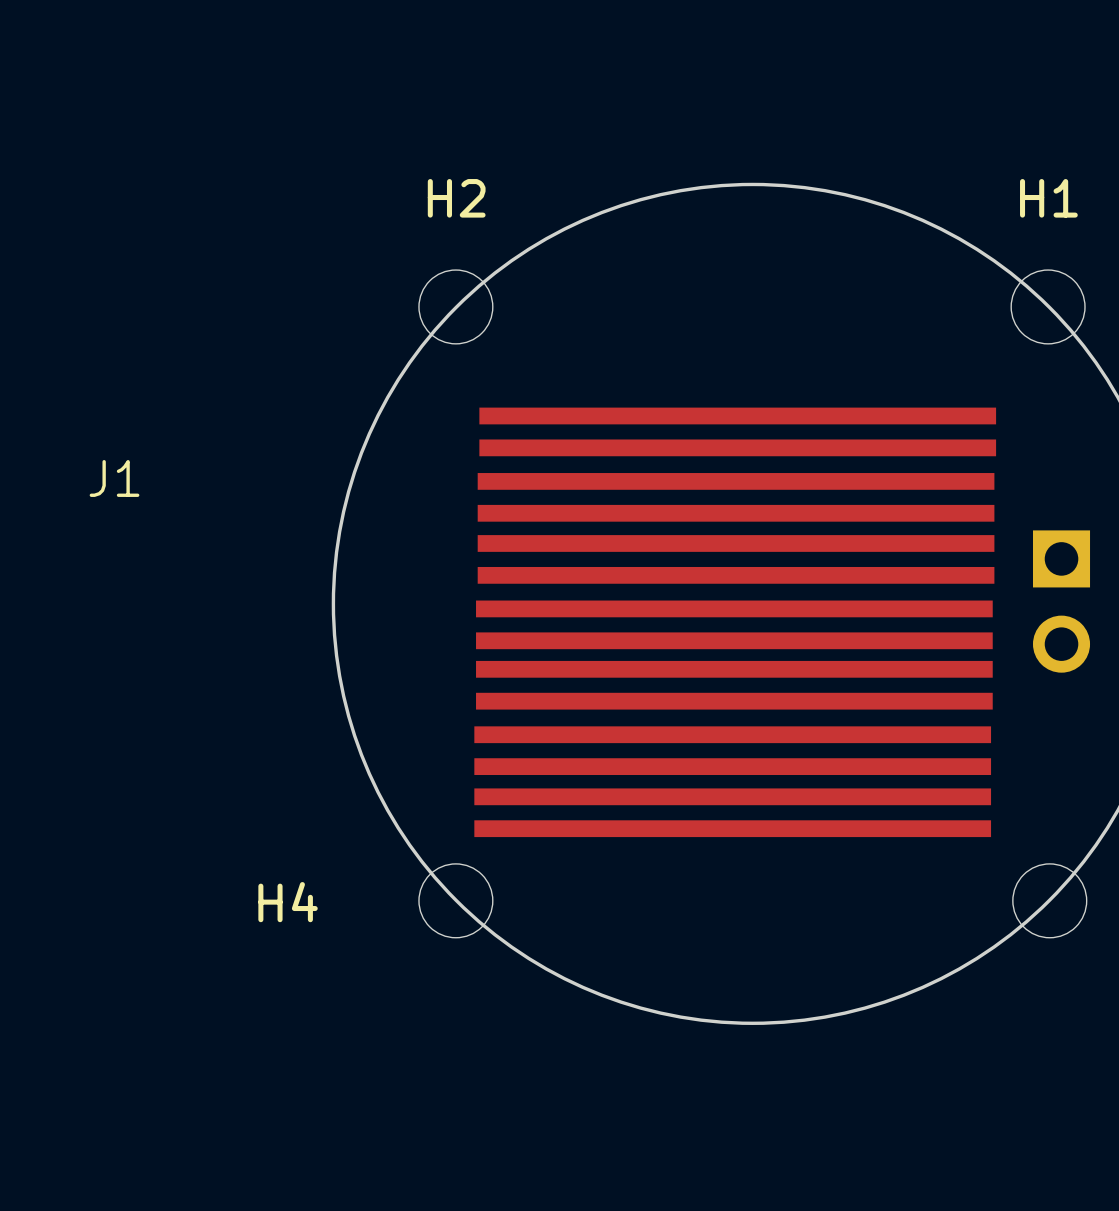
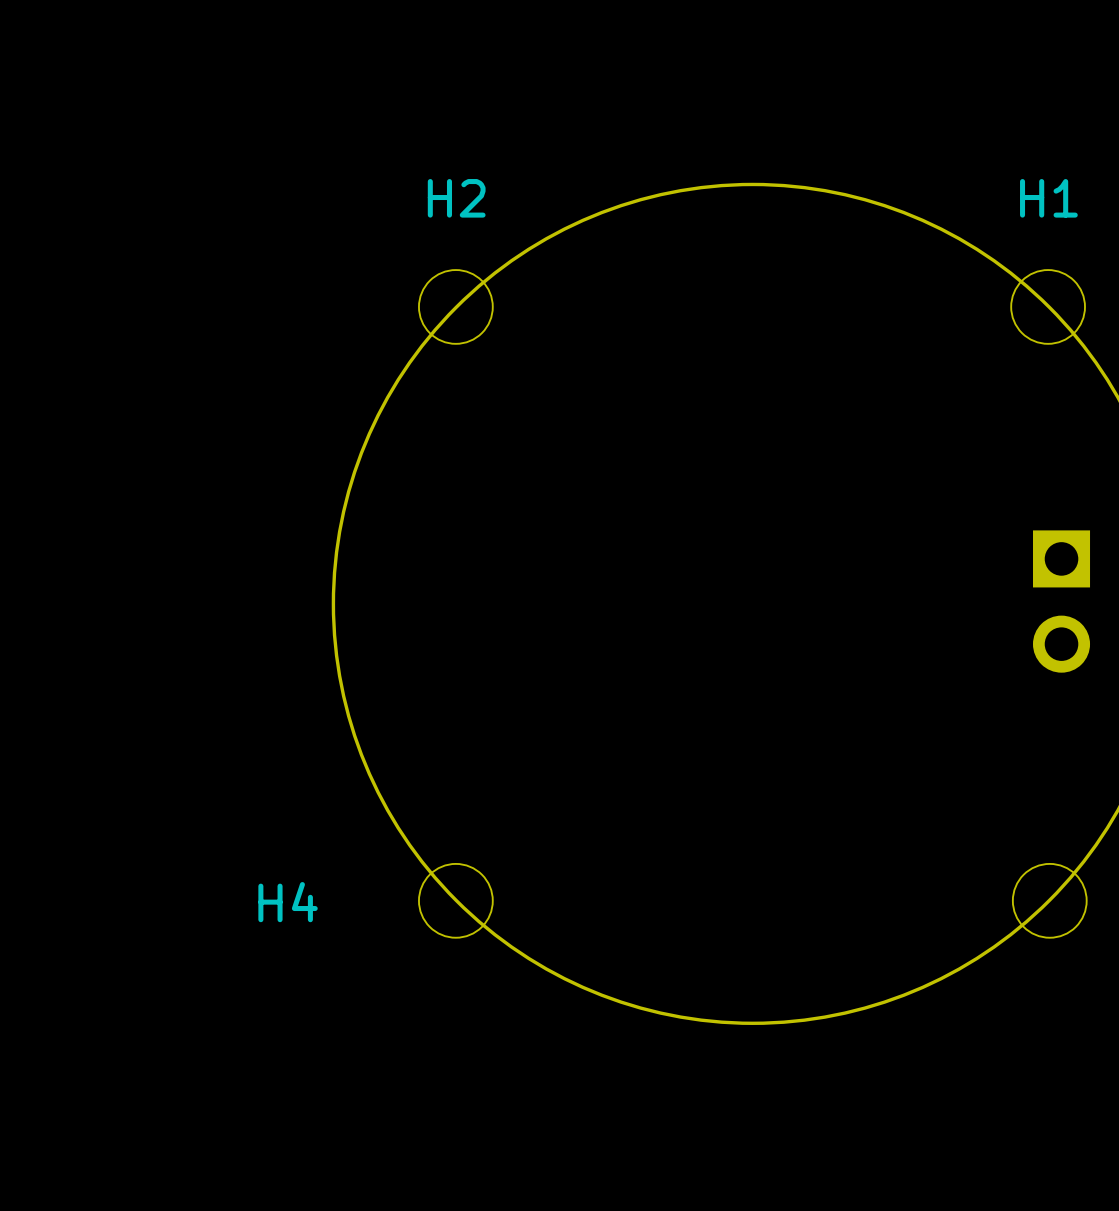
J1: (735, 622) -> none

